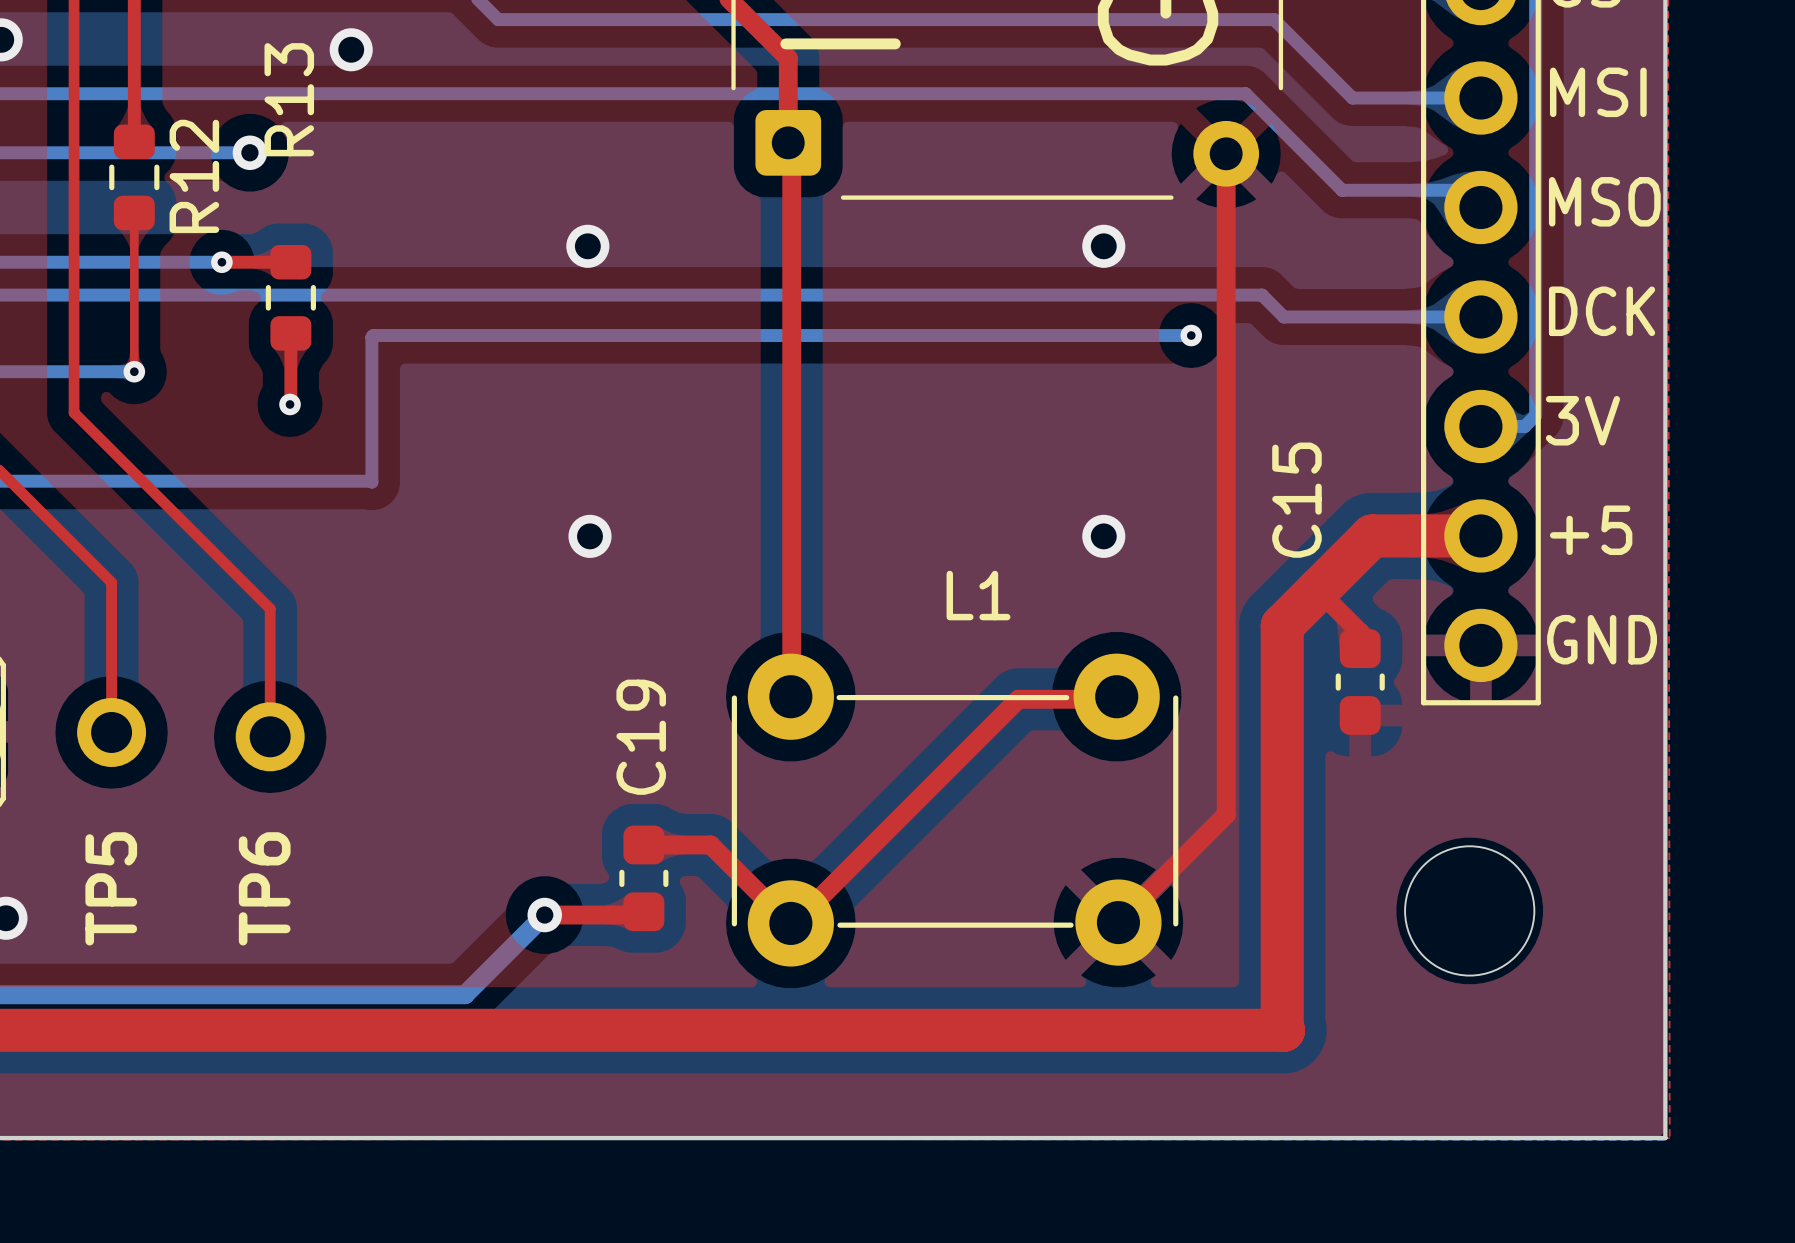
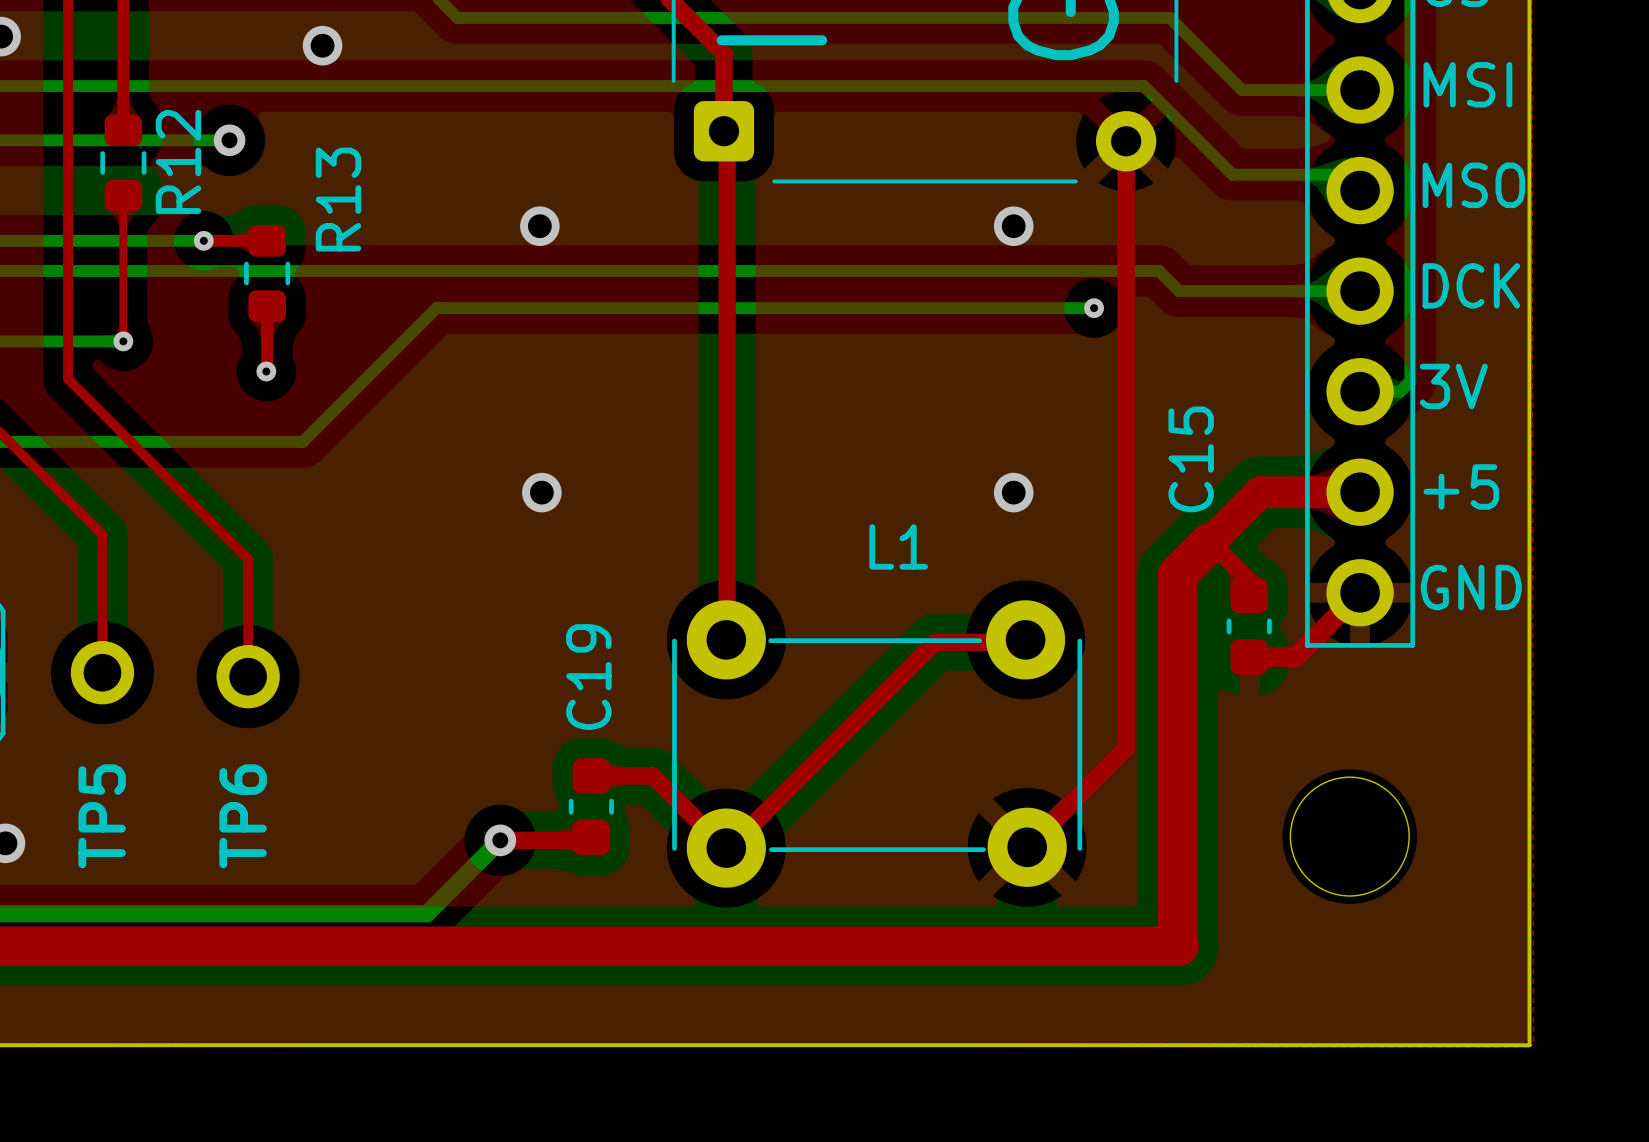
R13 name position: R13 (289, 99) -> R13 (338, 199)
bottom track: (475, 335) (373, 335) (371, 337) (371, 482) (329, 481) -> (436, 308) (302, 441)
top track width: thick (1480, 535) (1372, 535) (1317, 590) -> thin (1360, 492) (1260, 492) (1210, 541)
top track: none -> (1360, 592) (1295, 657) (1249, 657)

